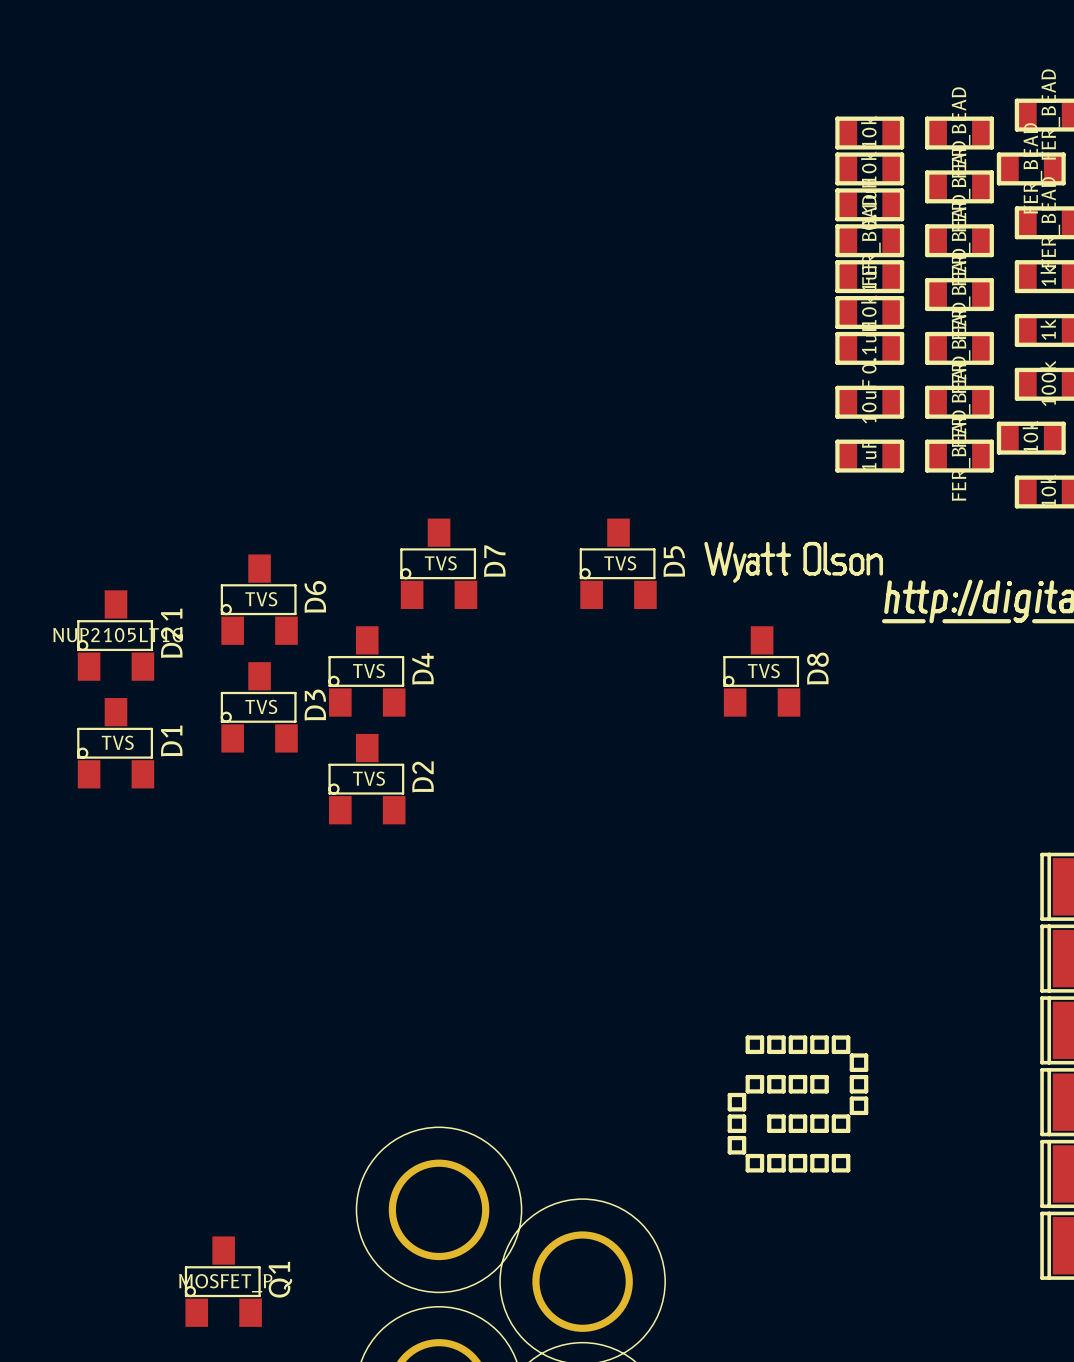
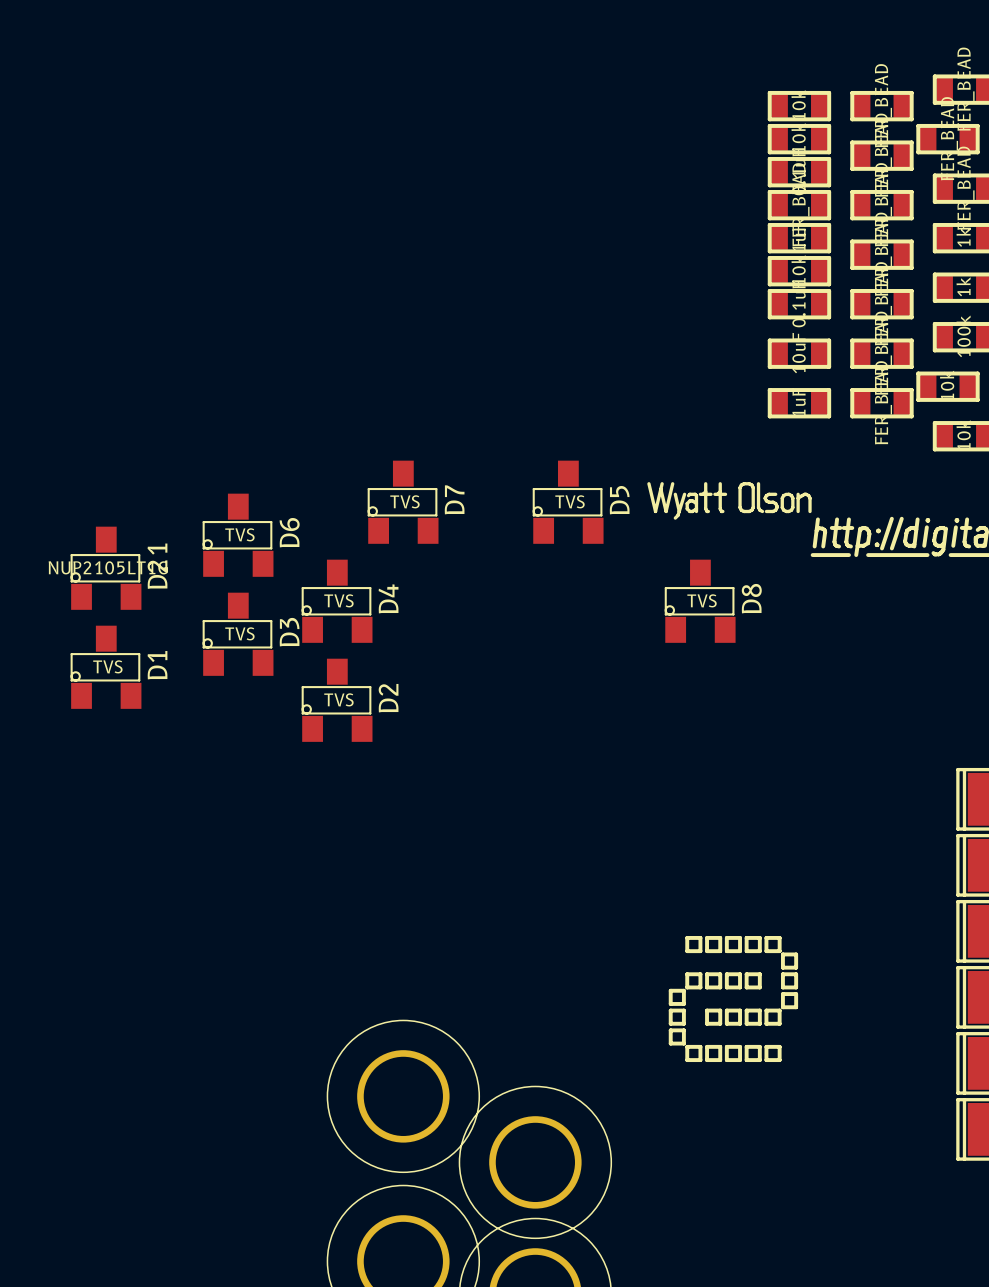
Q1: MOSFET_P (223, 1281) -> none

